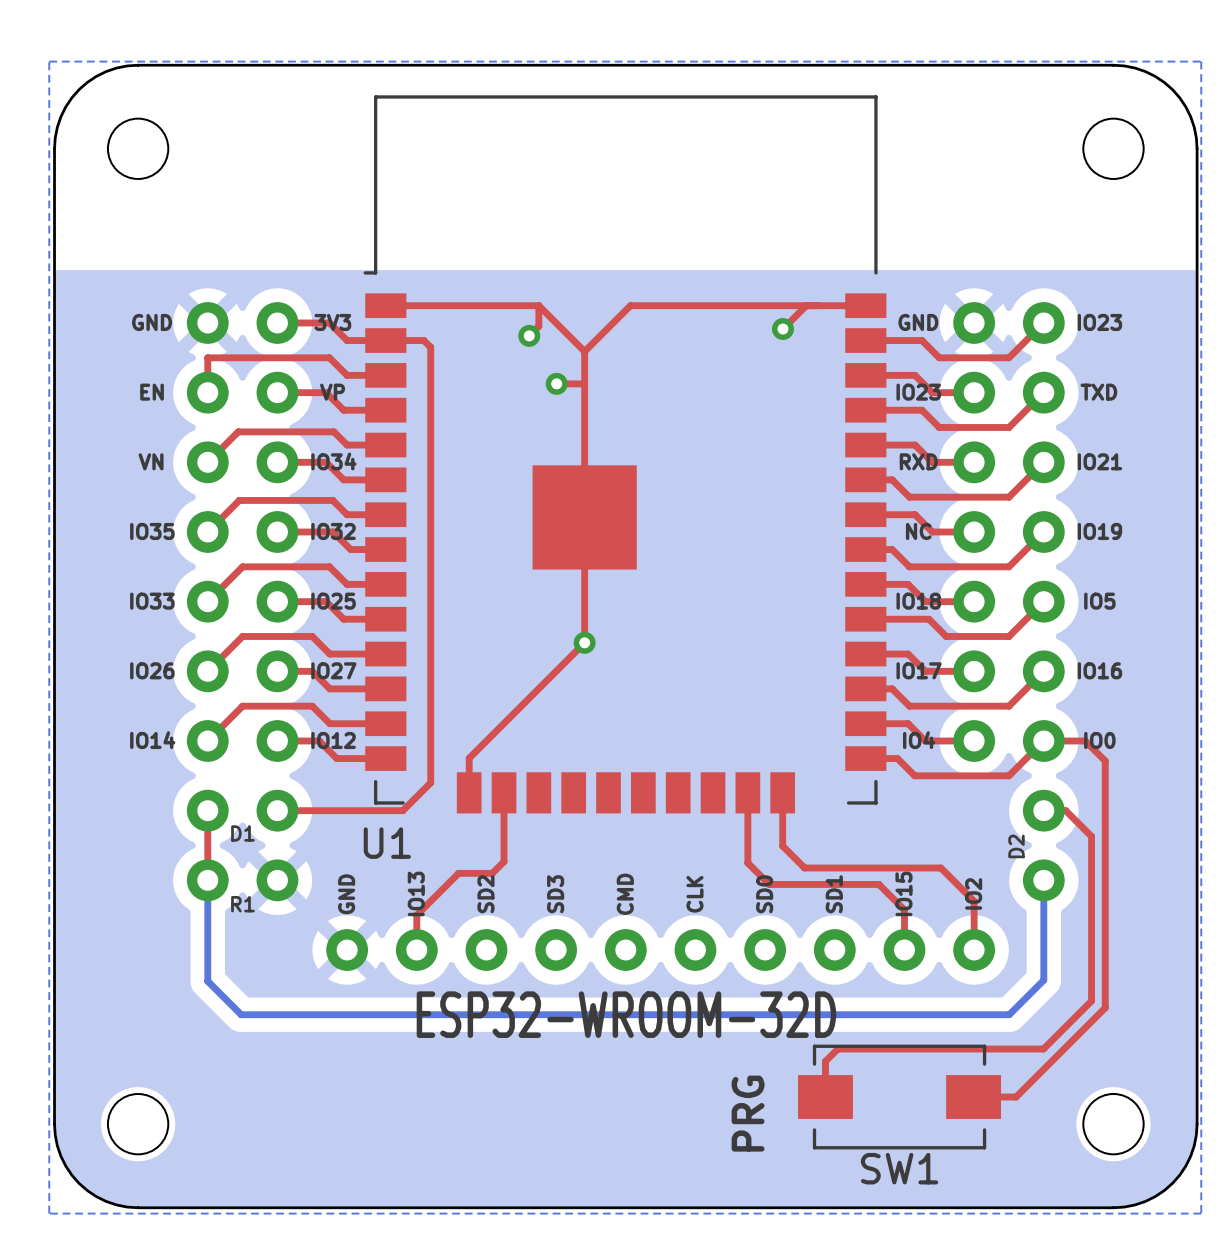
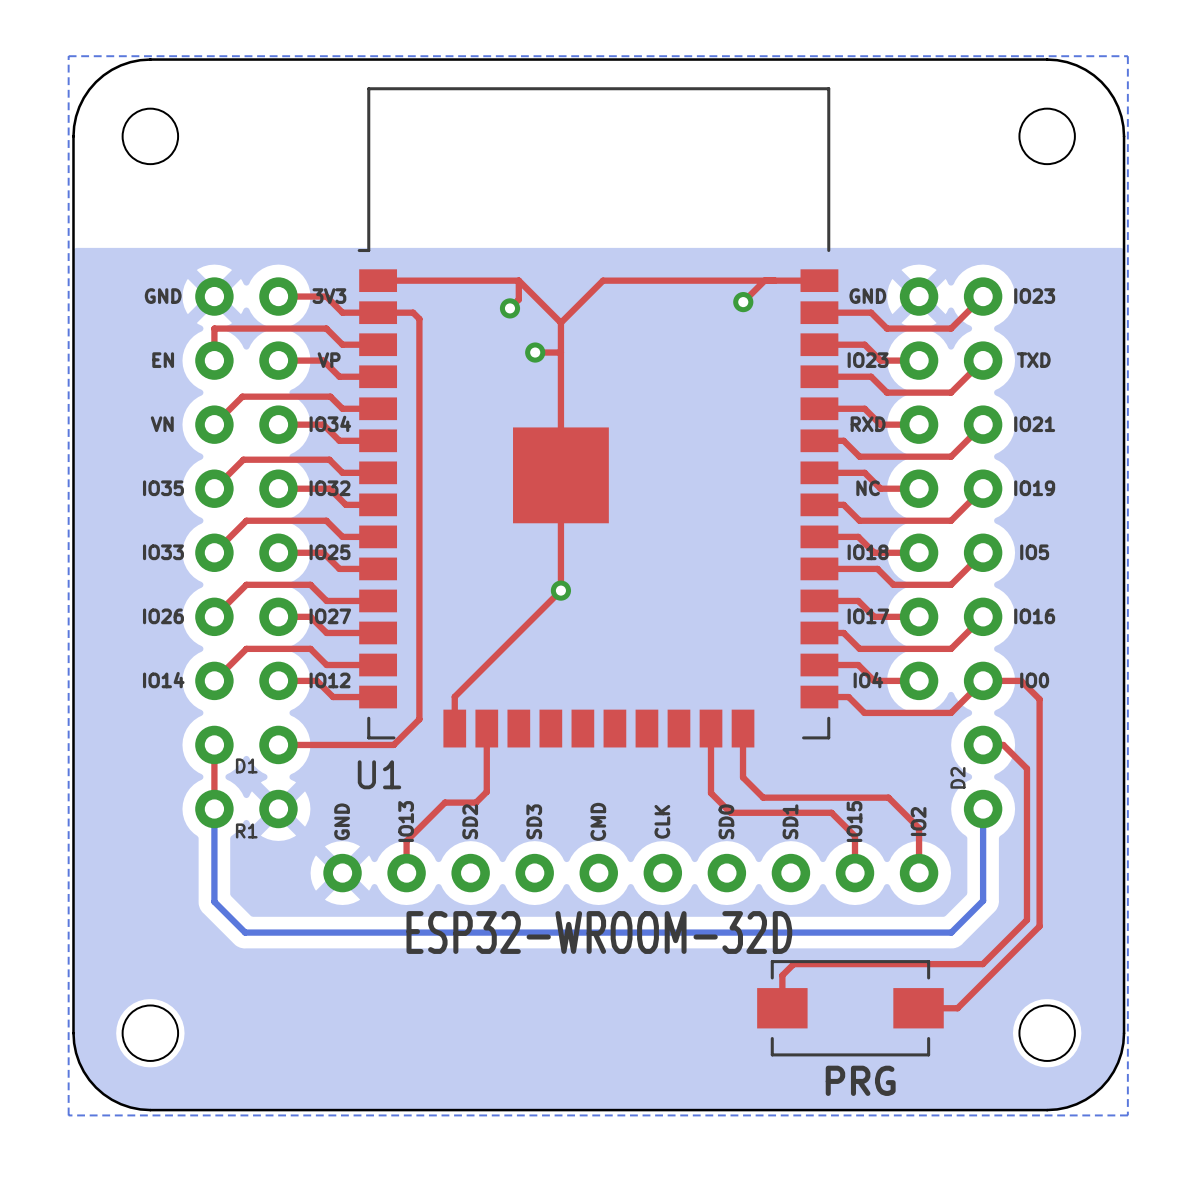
text rotation: 0° (748, 1113) -> 90° clockwise (860, 1080)
text position: PRG (748, 1113) -> PRG (860, 1080)
SW1 name: SW1 (899, 1168) -> none

